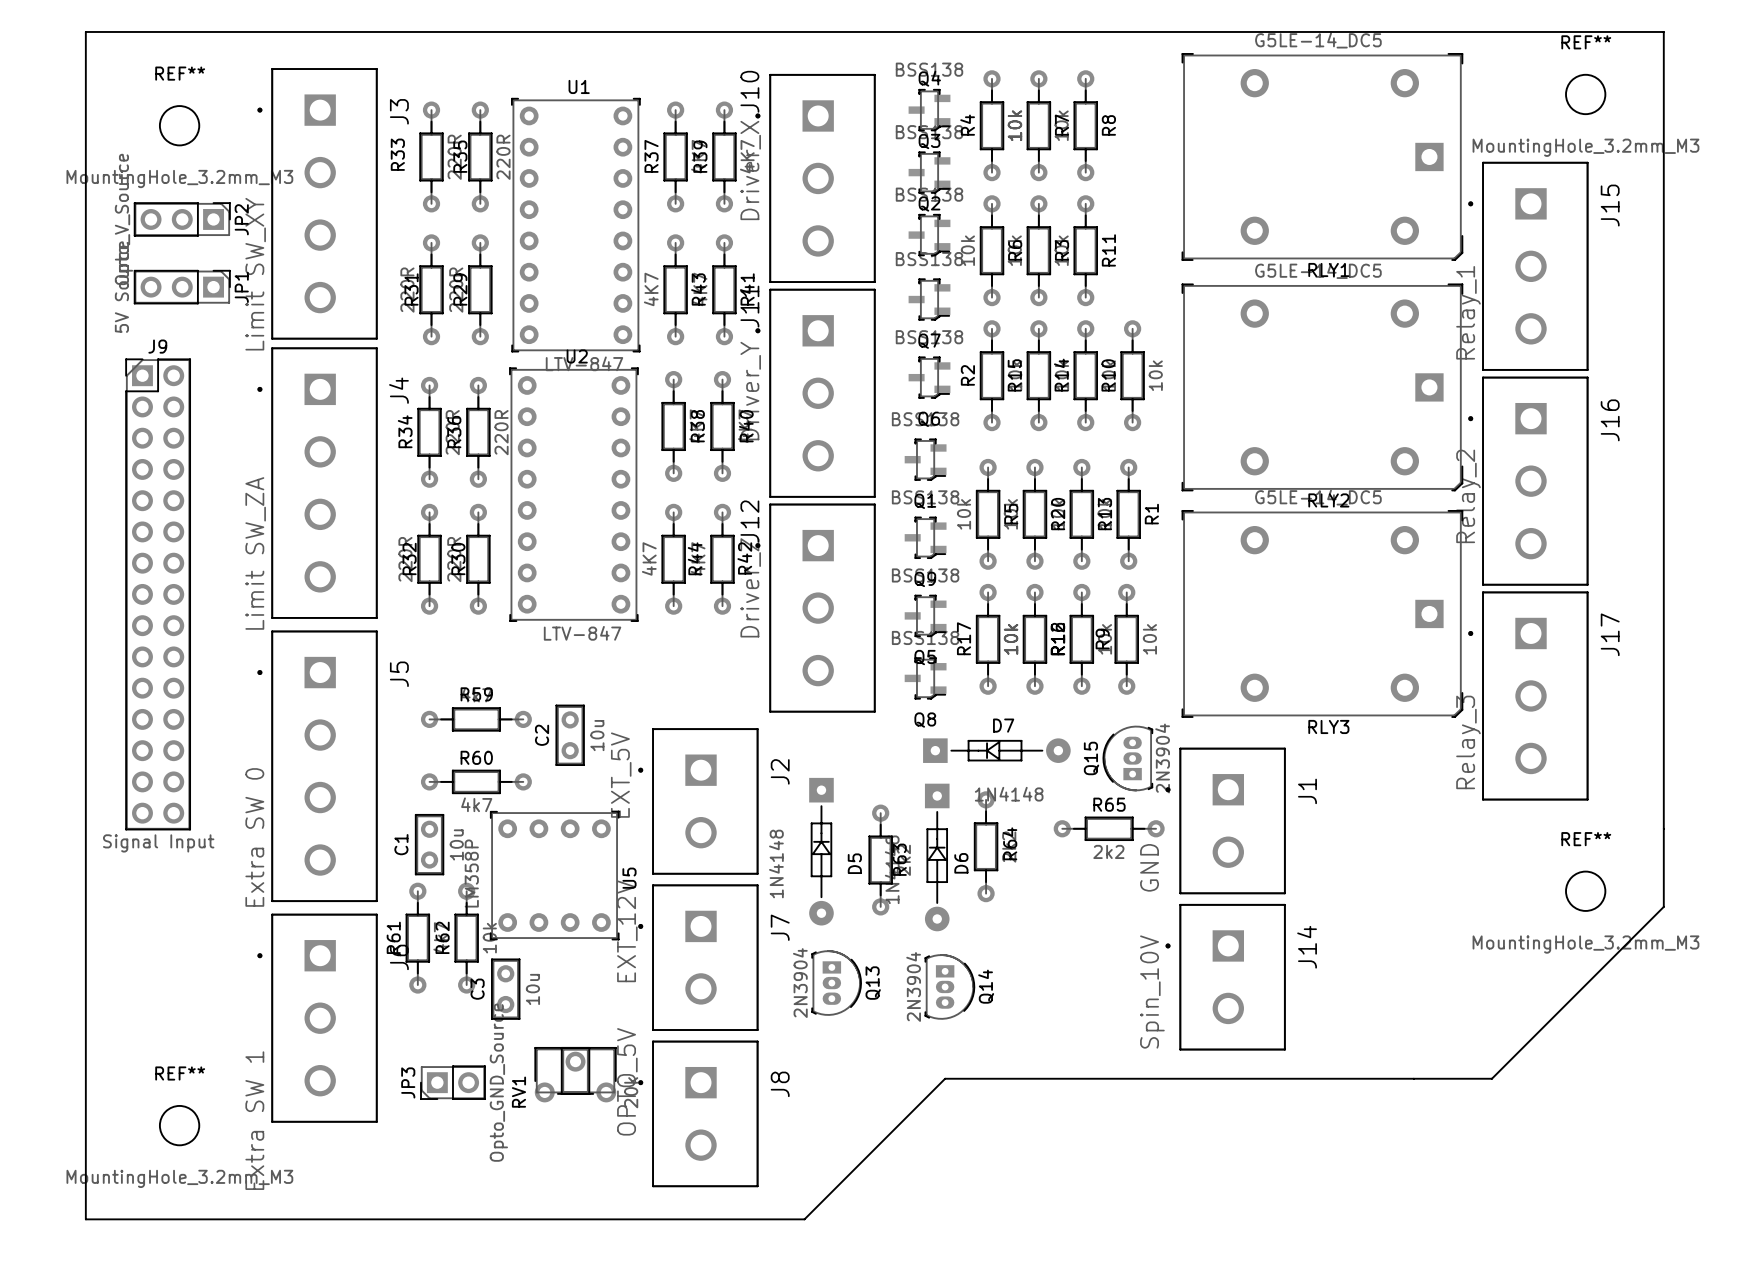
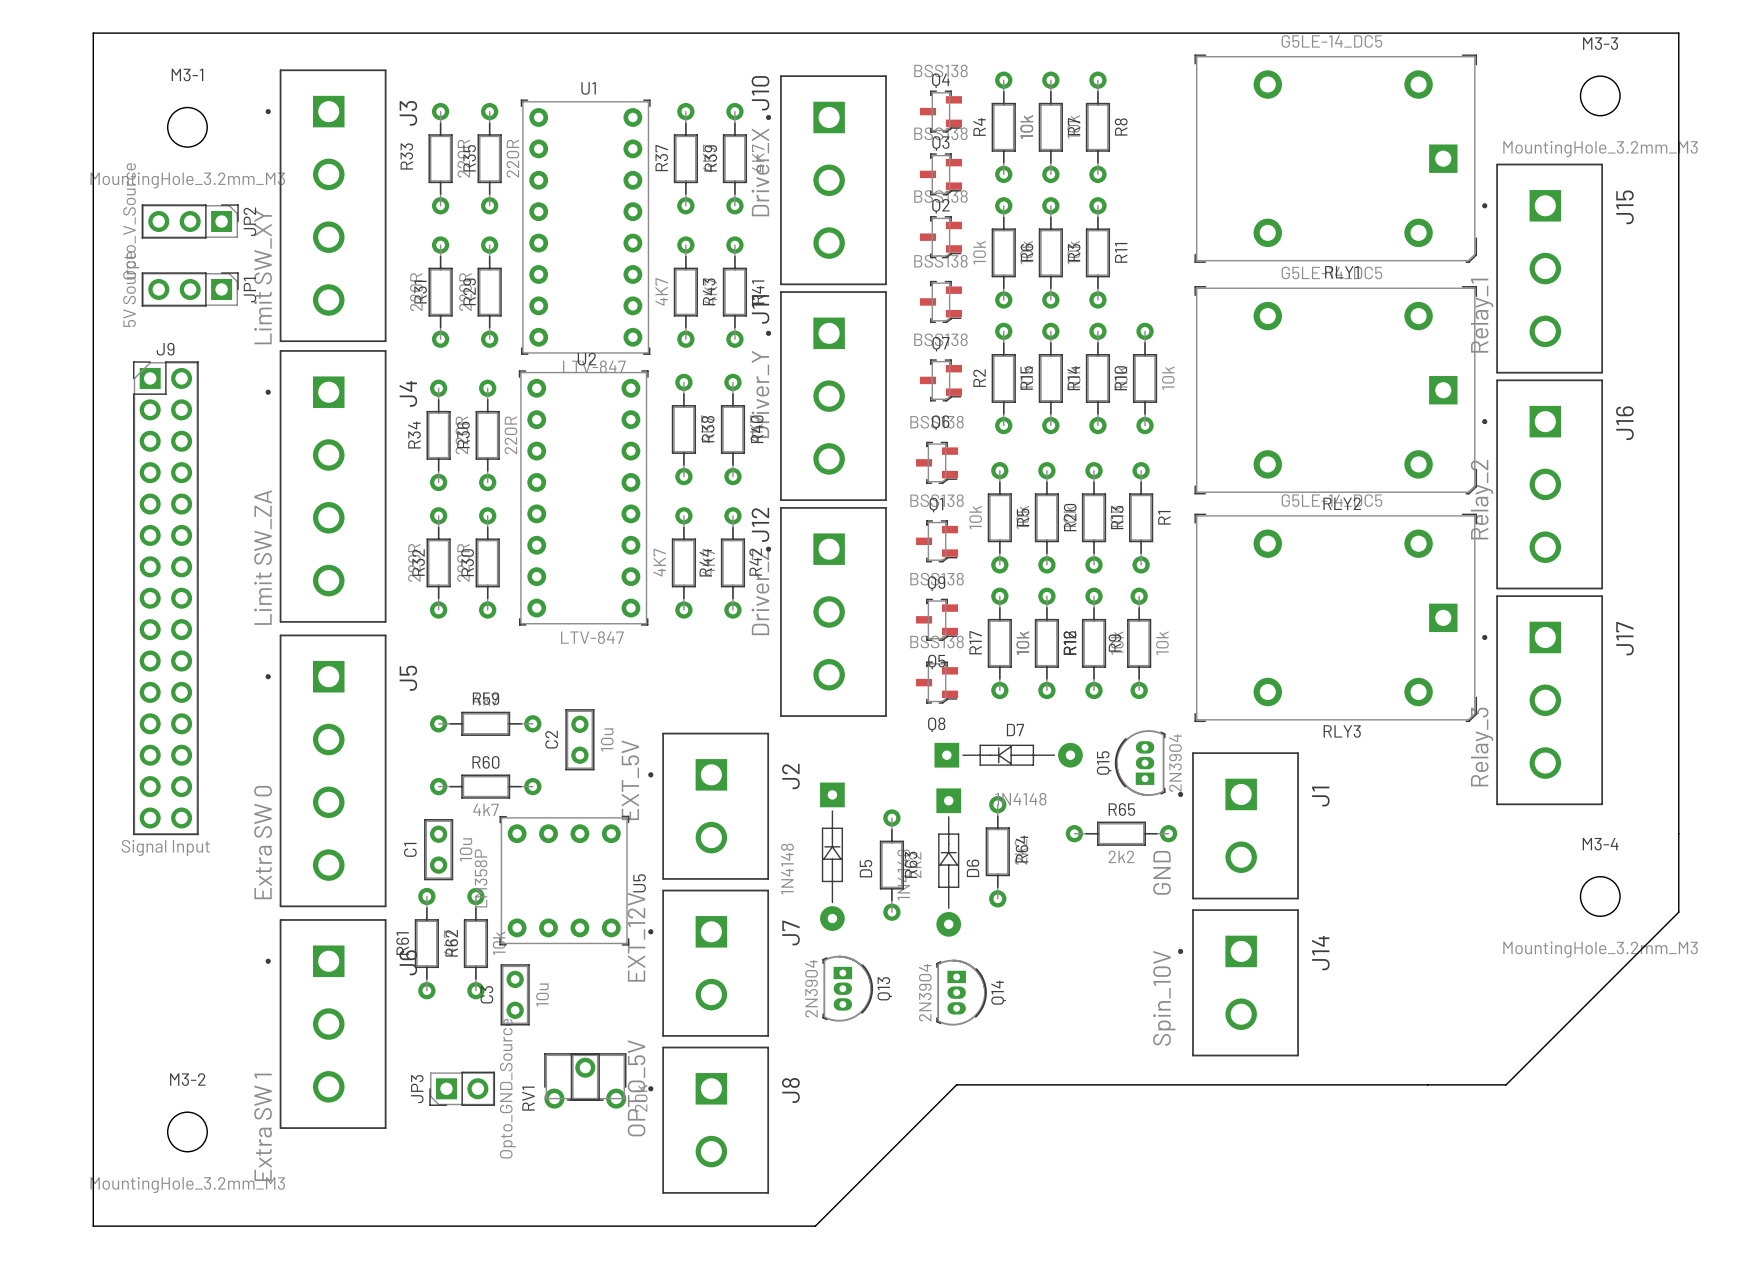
REF** name: REF** (1586, 42) -> M3-3 (1600, 43)
REF** name: REF** (180, 73) -> M3-1 (187, 74)
REF** name: REF** (1586, 839) -> M3-4 (1600, 844)
REF** name: REF** (180, 1073) -> M3-2 (187, 1079)

